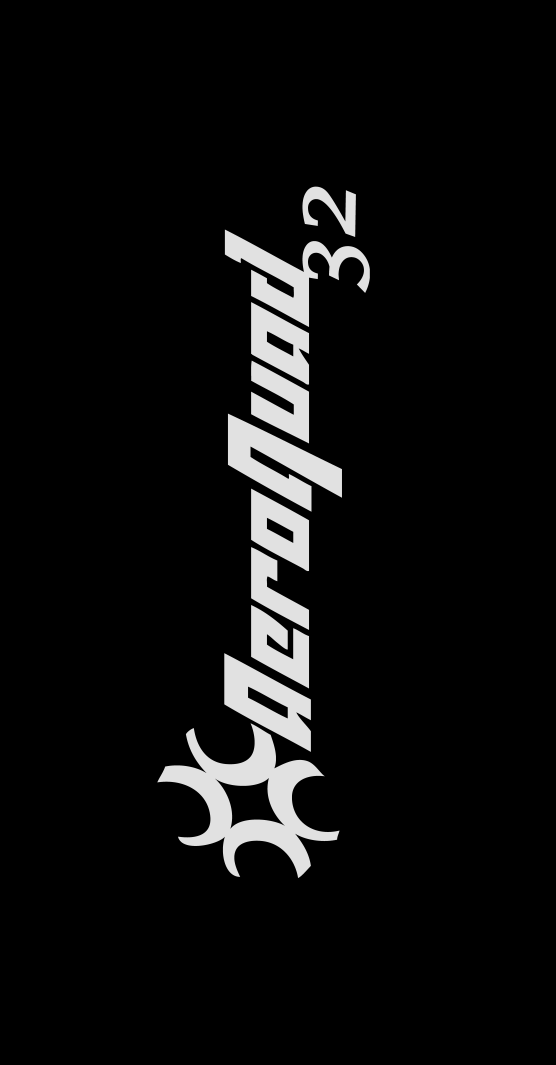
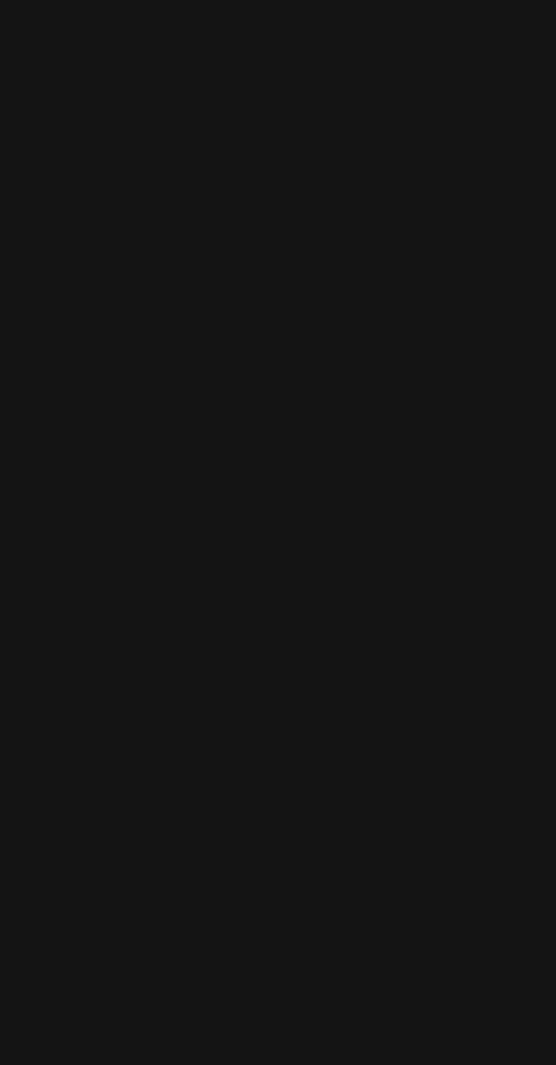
drawing: [157, 186, 370, 879] -> none

